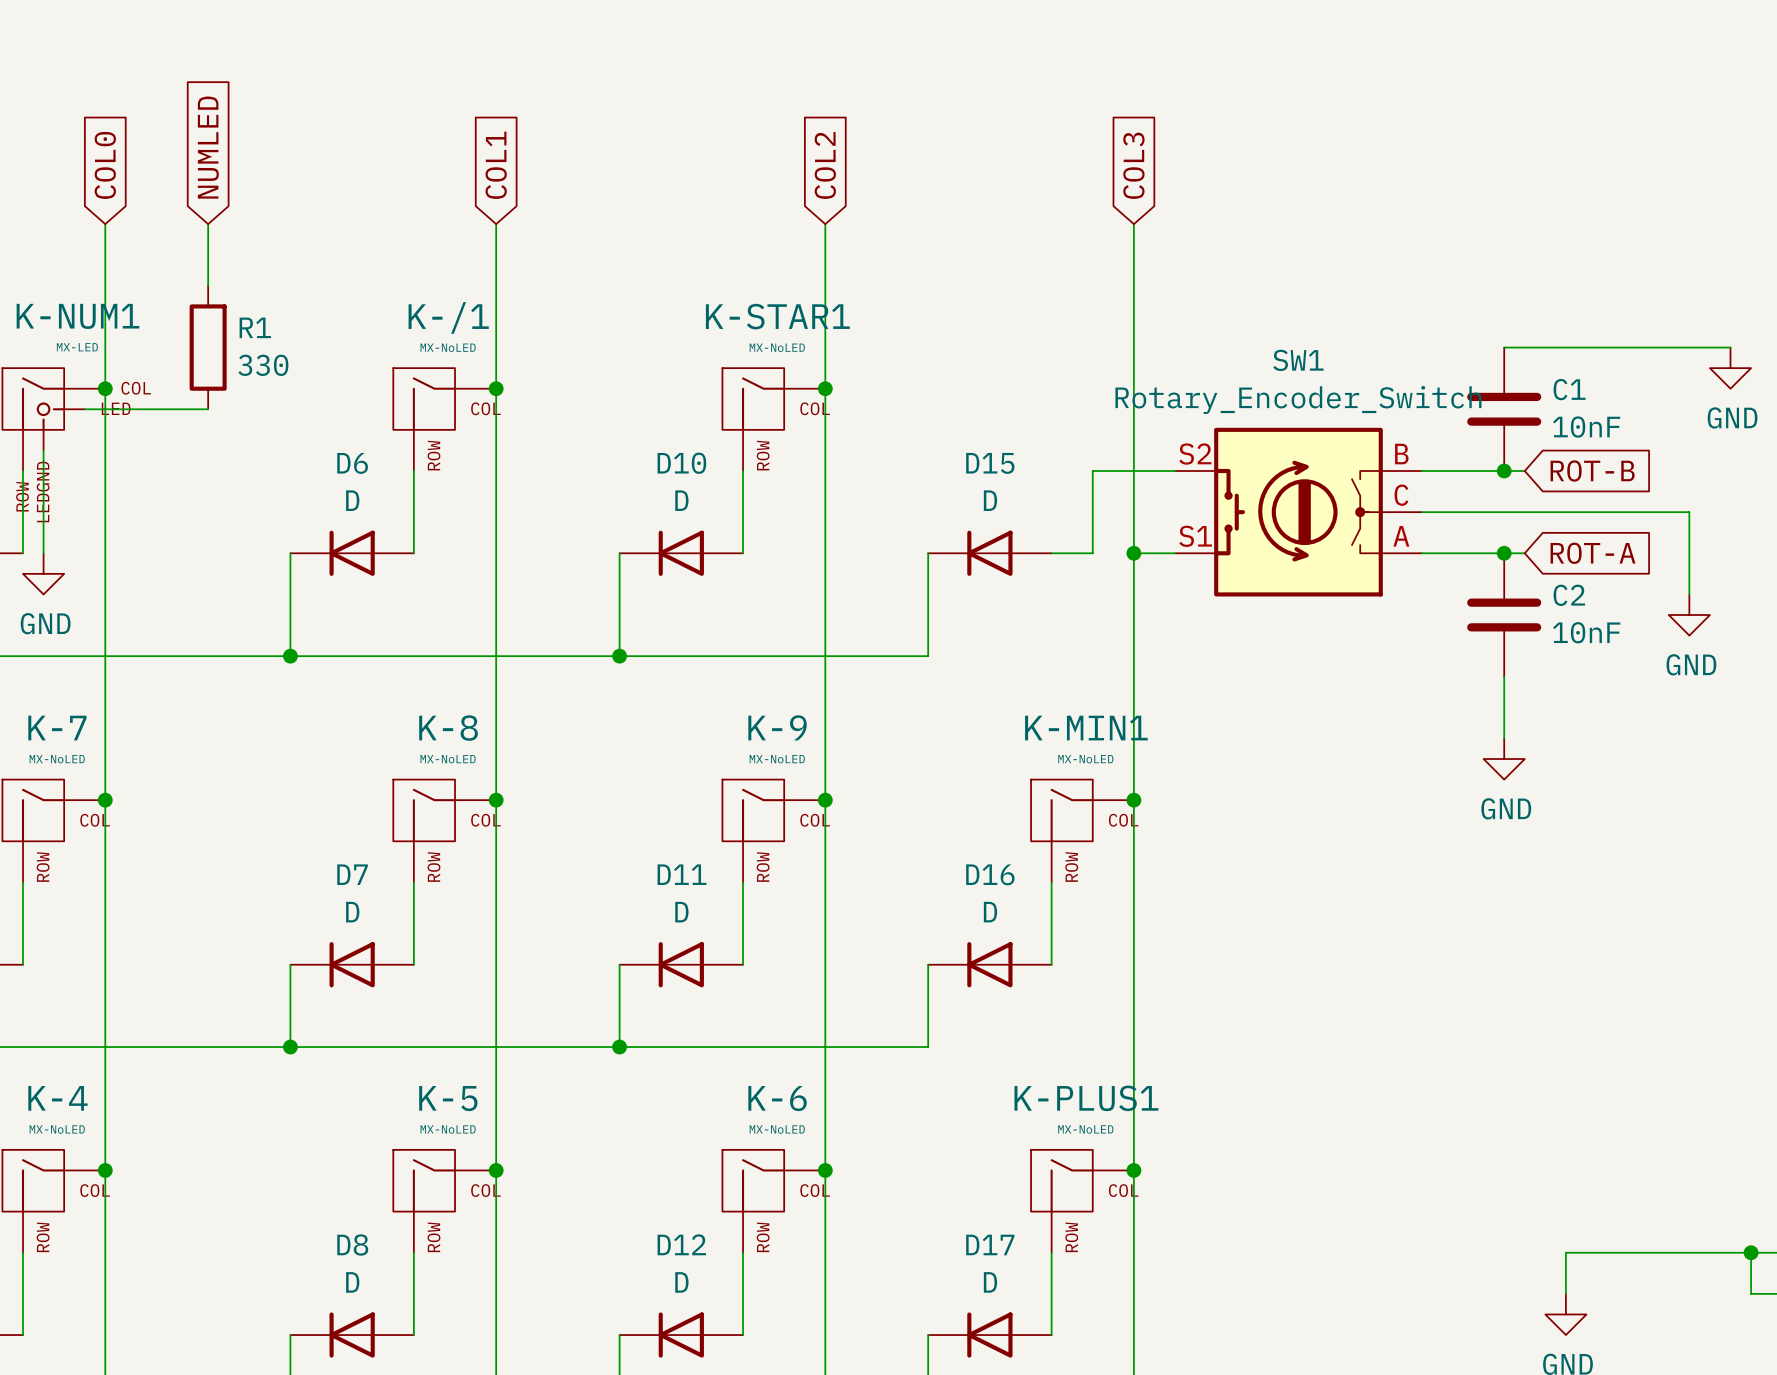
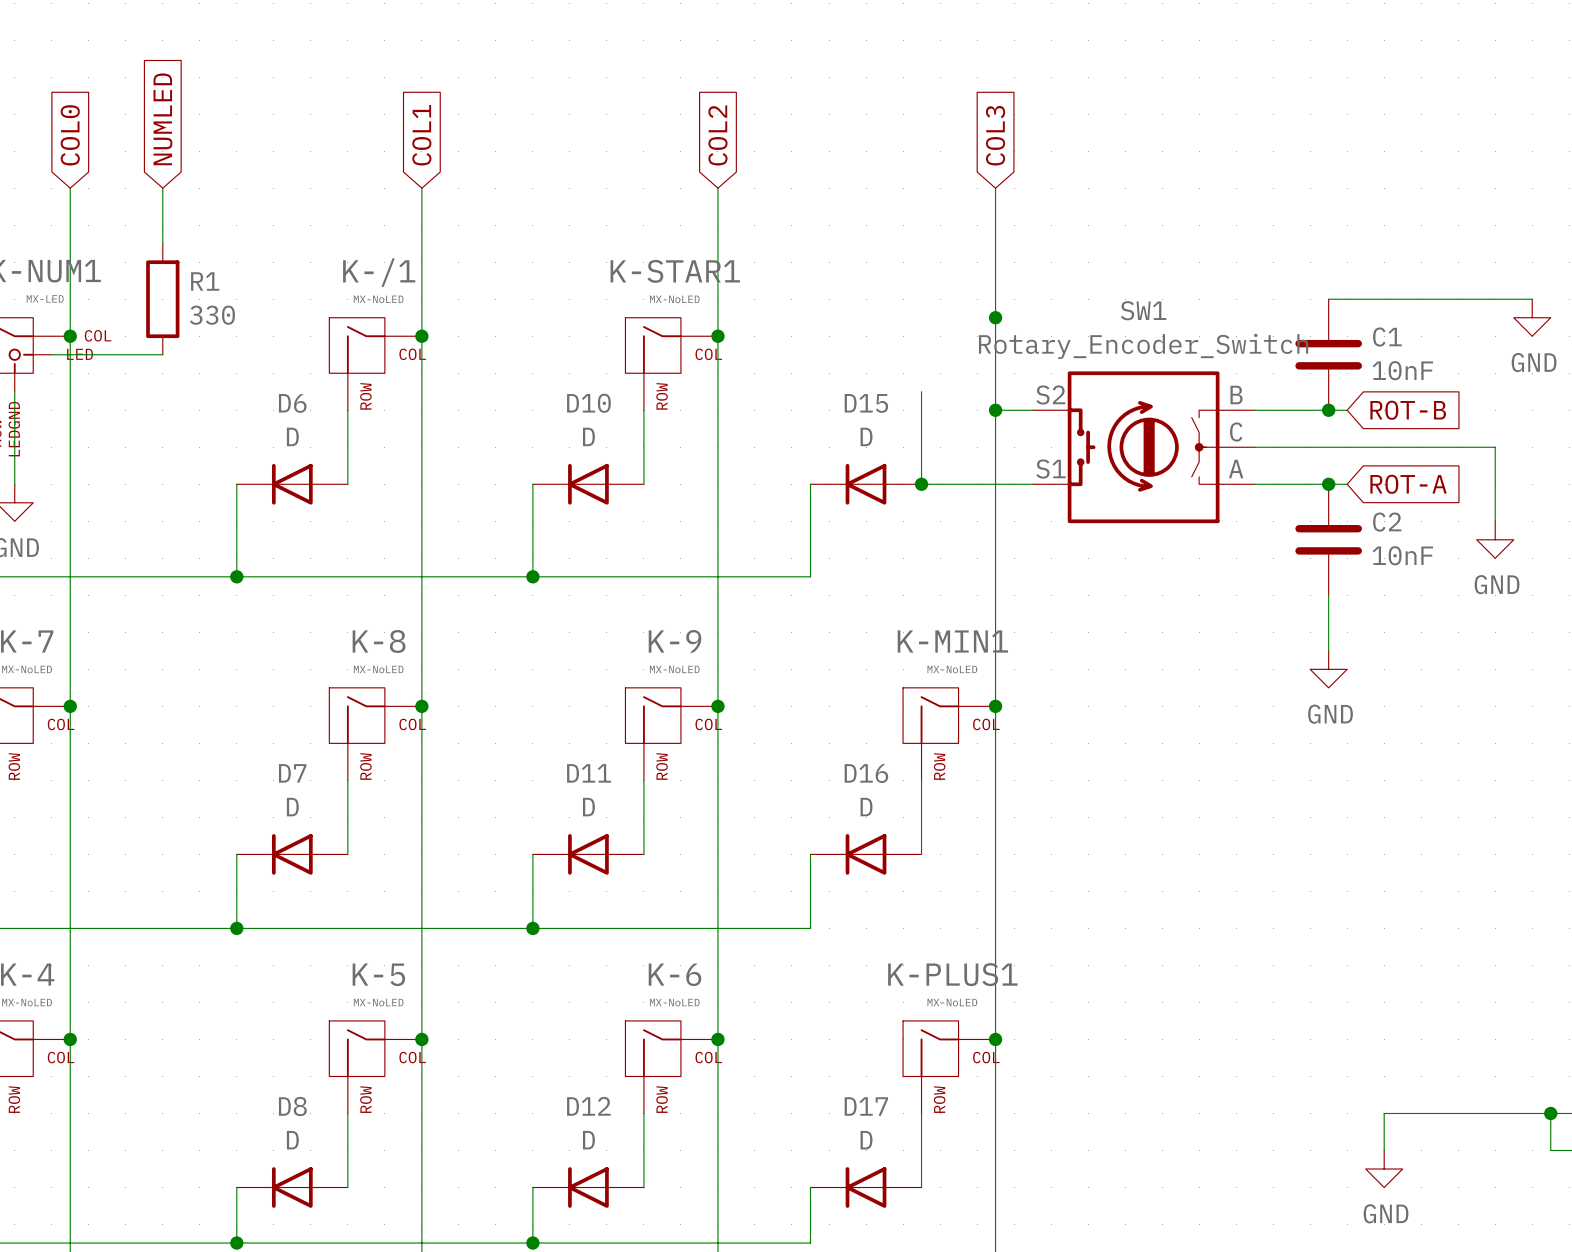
junction: none -> (995, 317)
wire: none -> (921, 391) (921, 484)
wire: (1133, 471) (1092, 471) (1092, 553) -> (995, 484) (958, 484)
junction: none -> (995, 410)
junction: none -> (921, 484)
junction: (1133, 553) -> none

